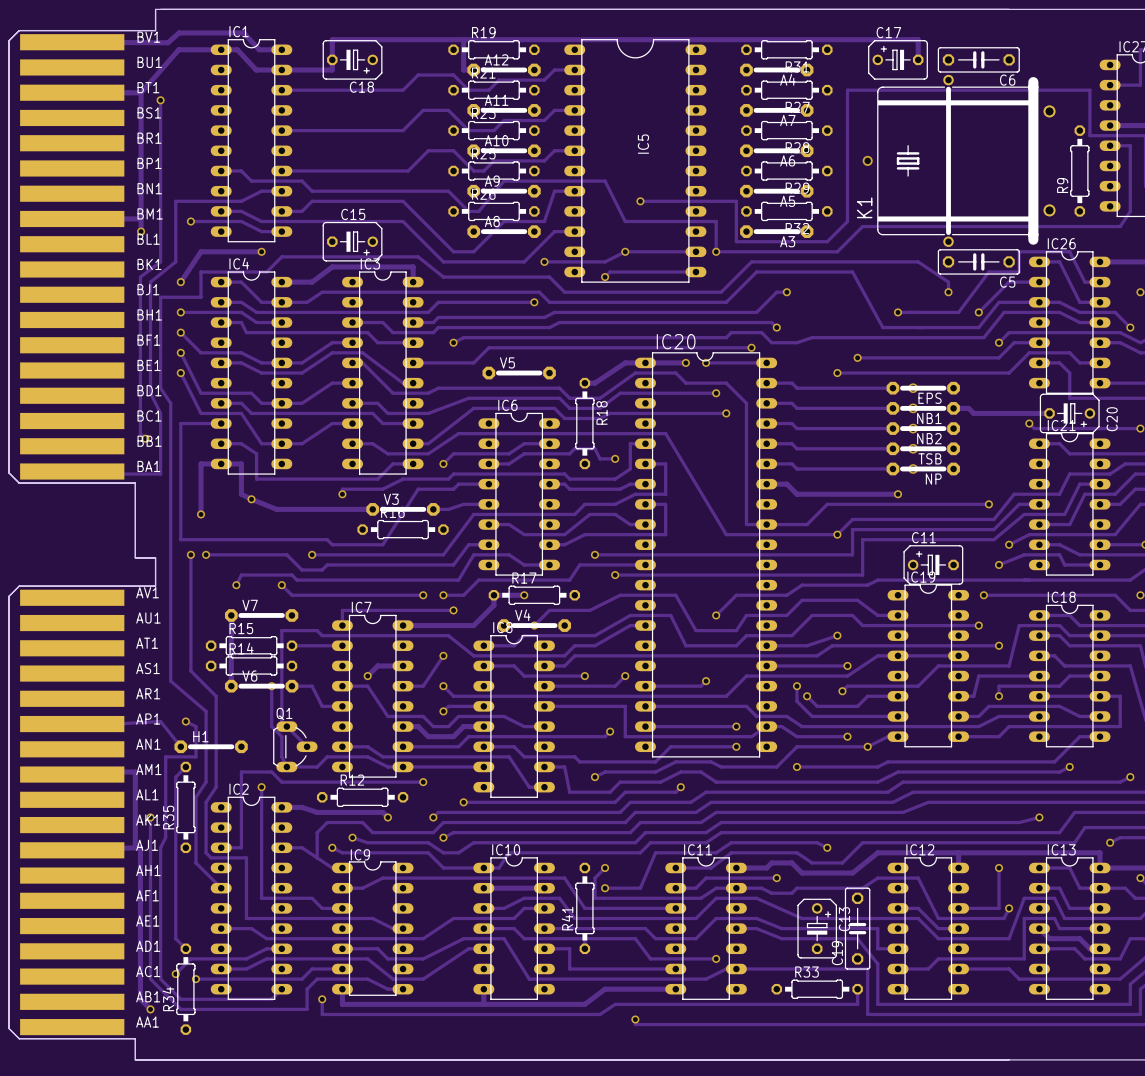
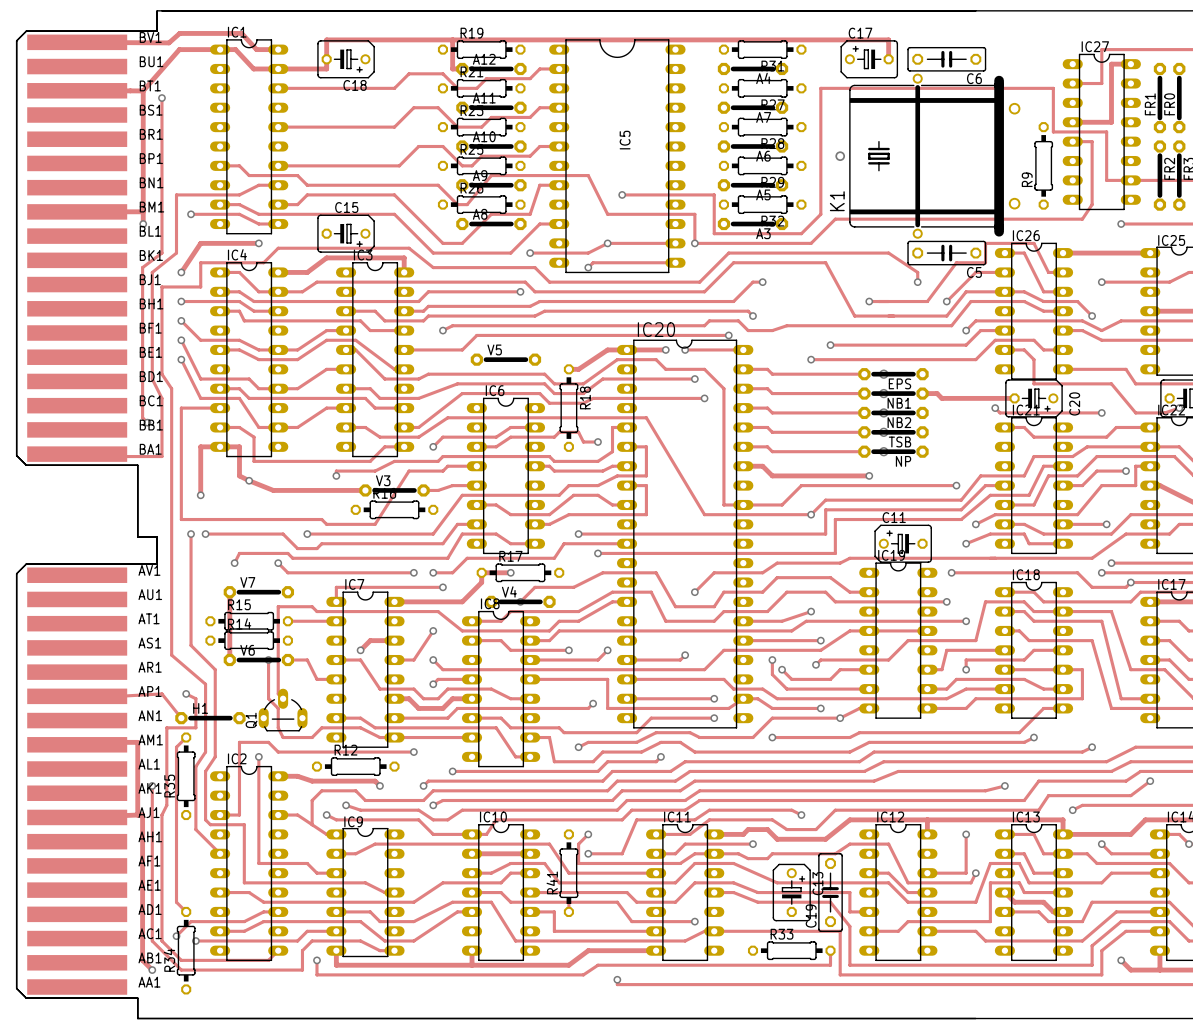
track: (286, 726) (307, 746) -> none
Q1 rotation: 0° (295, 746) -> 90° counterclockwise (283, 710)

